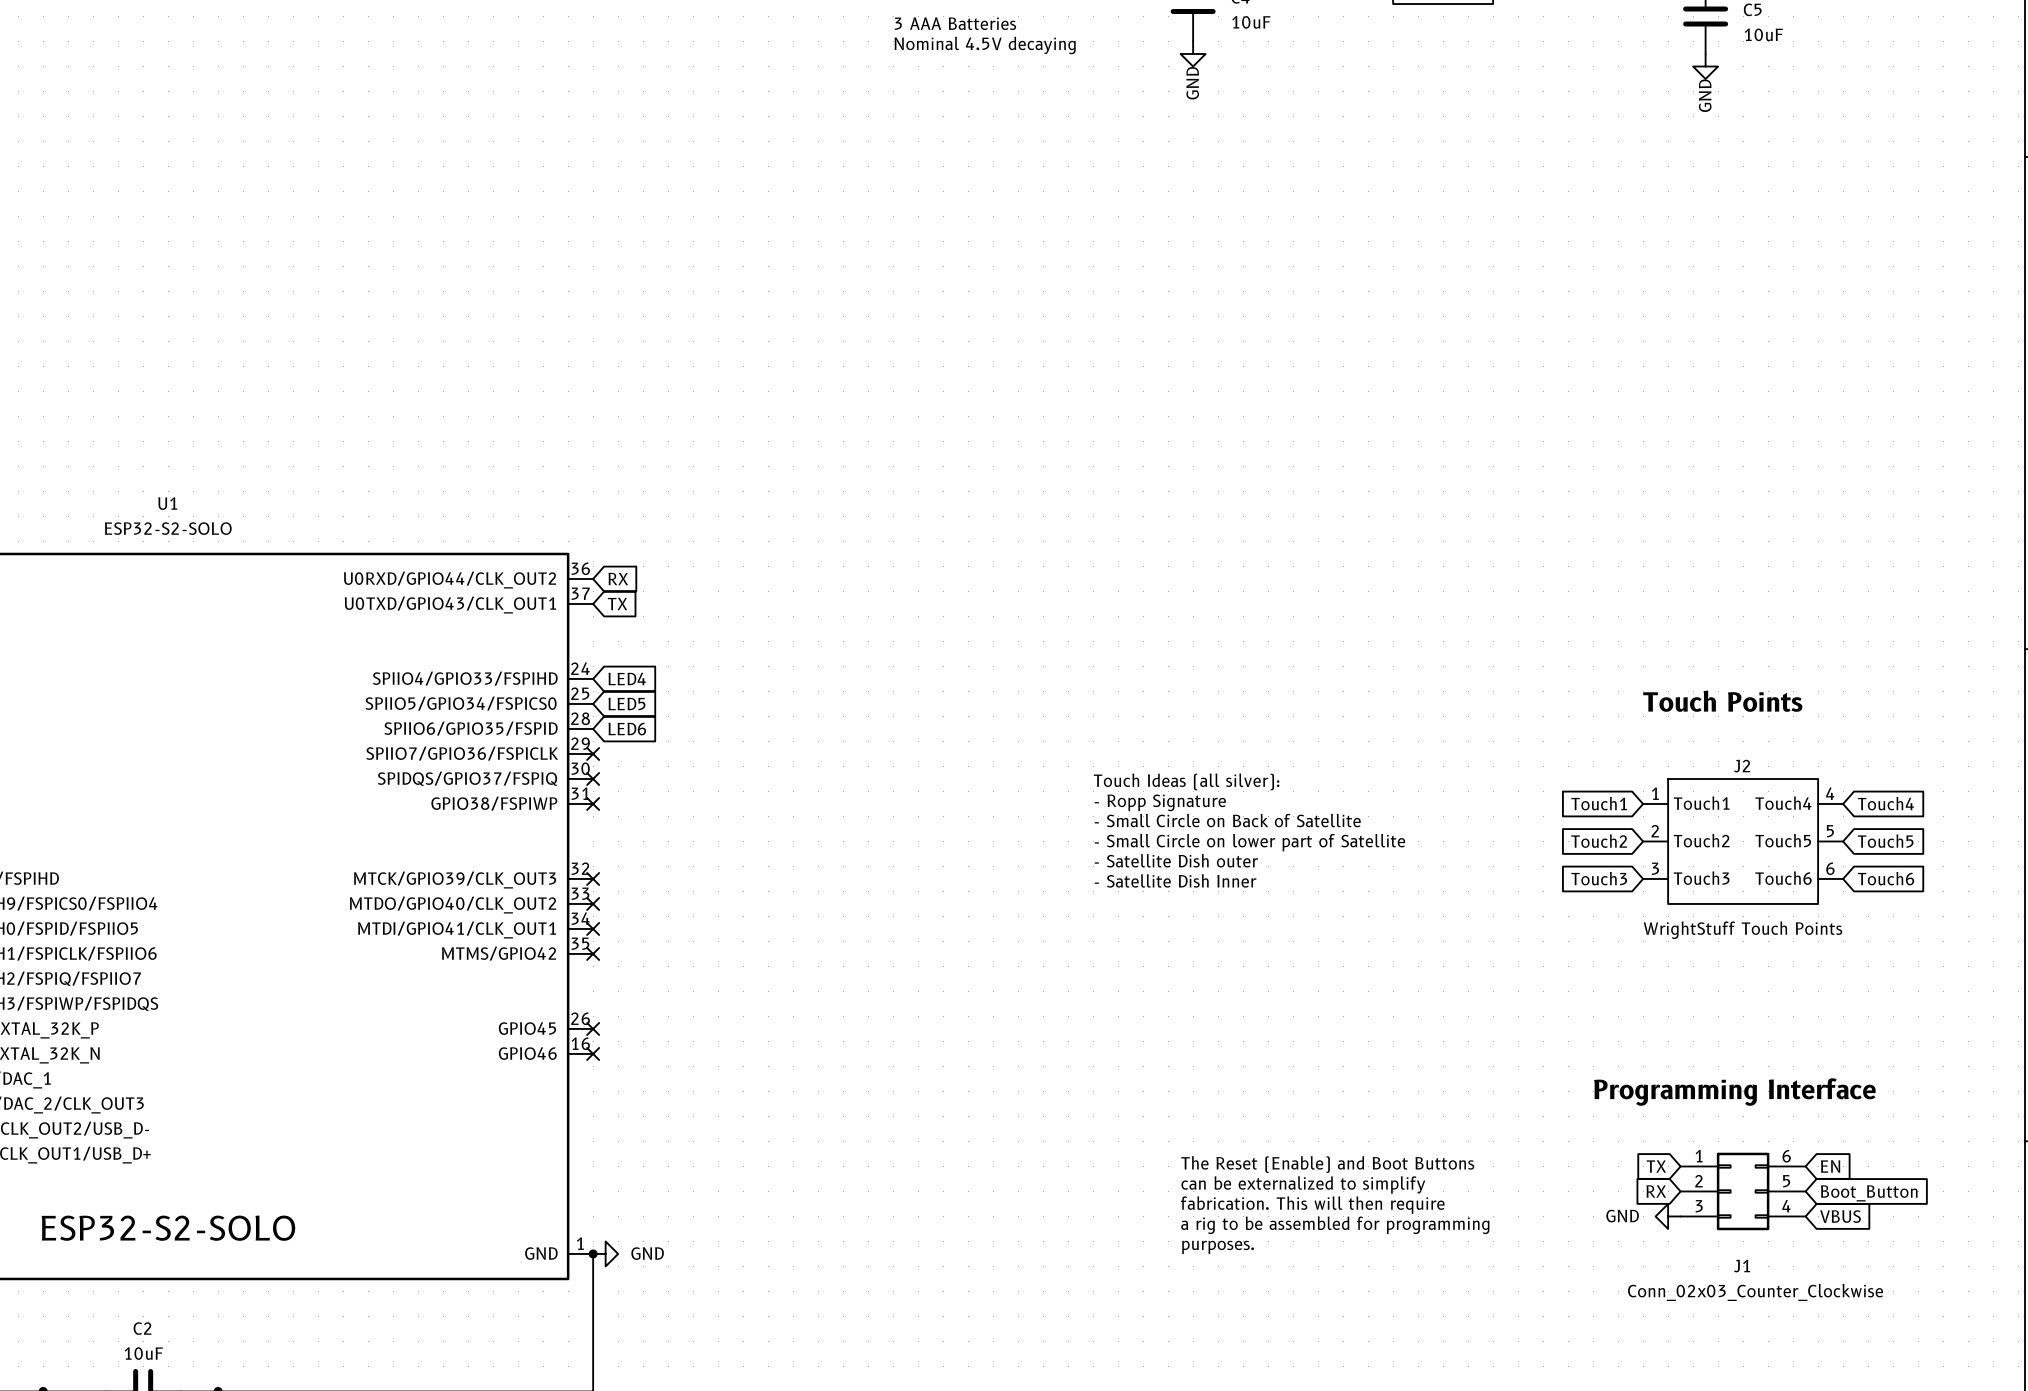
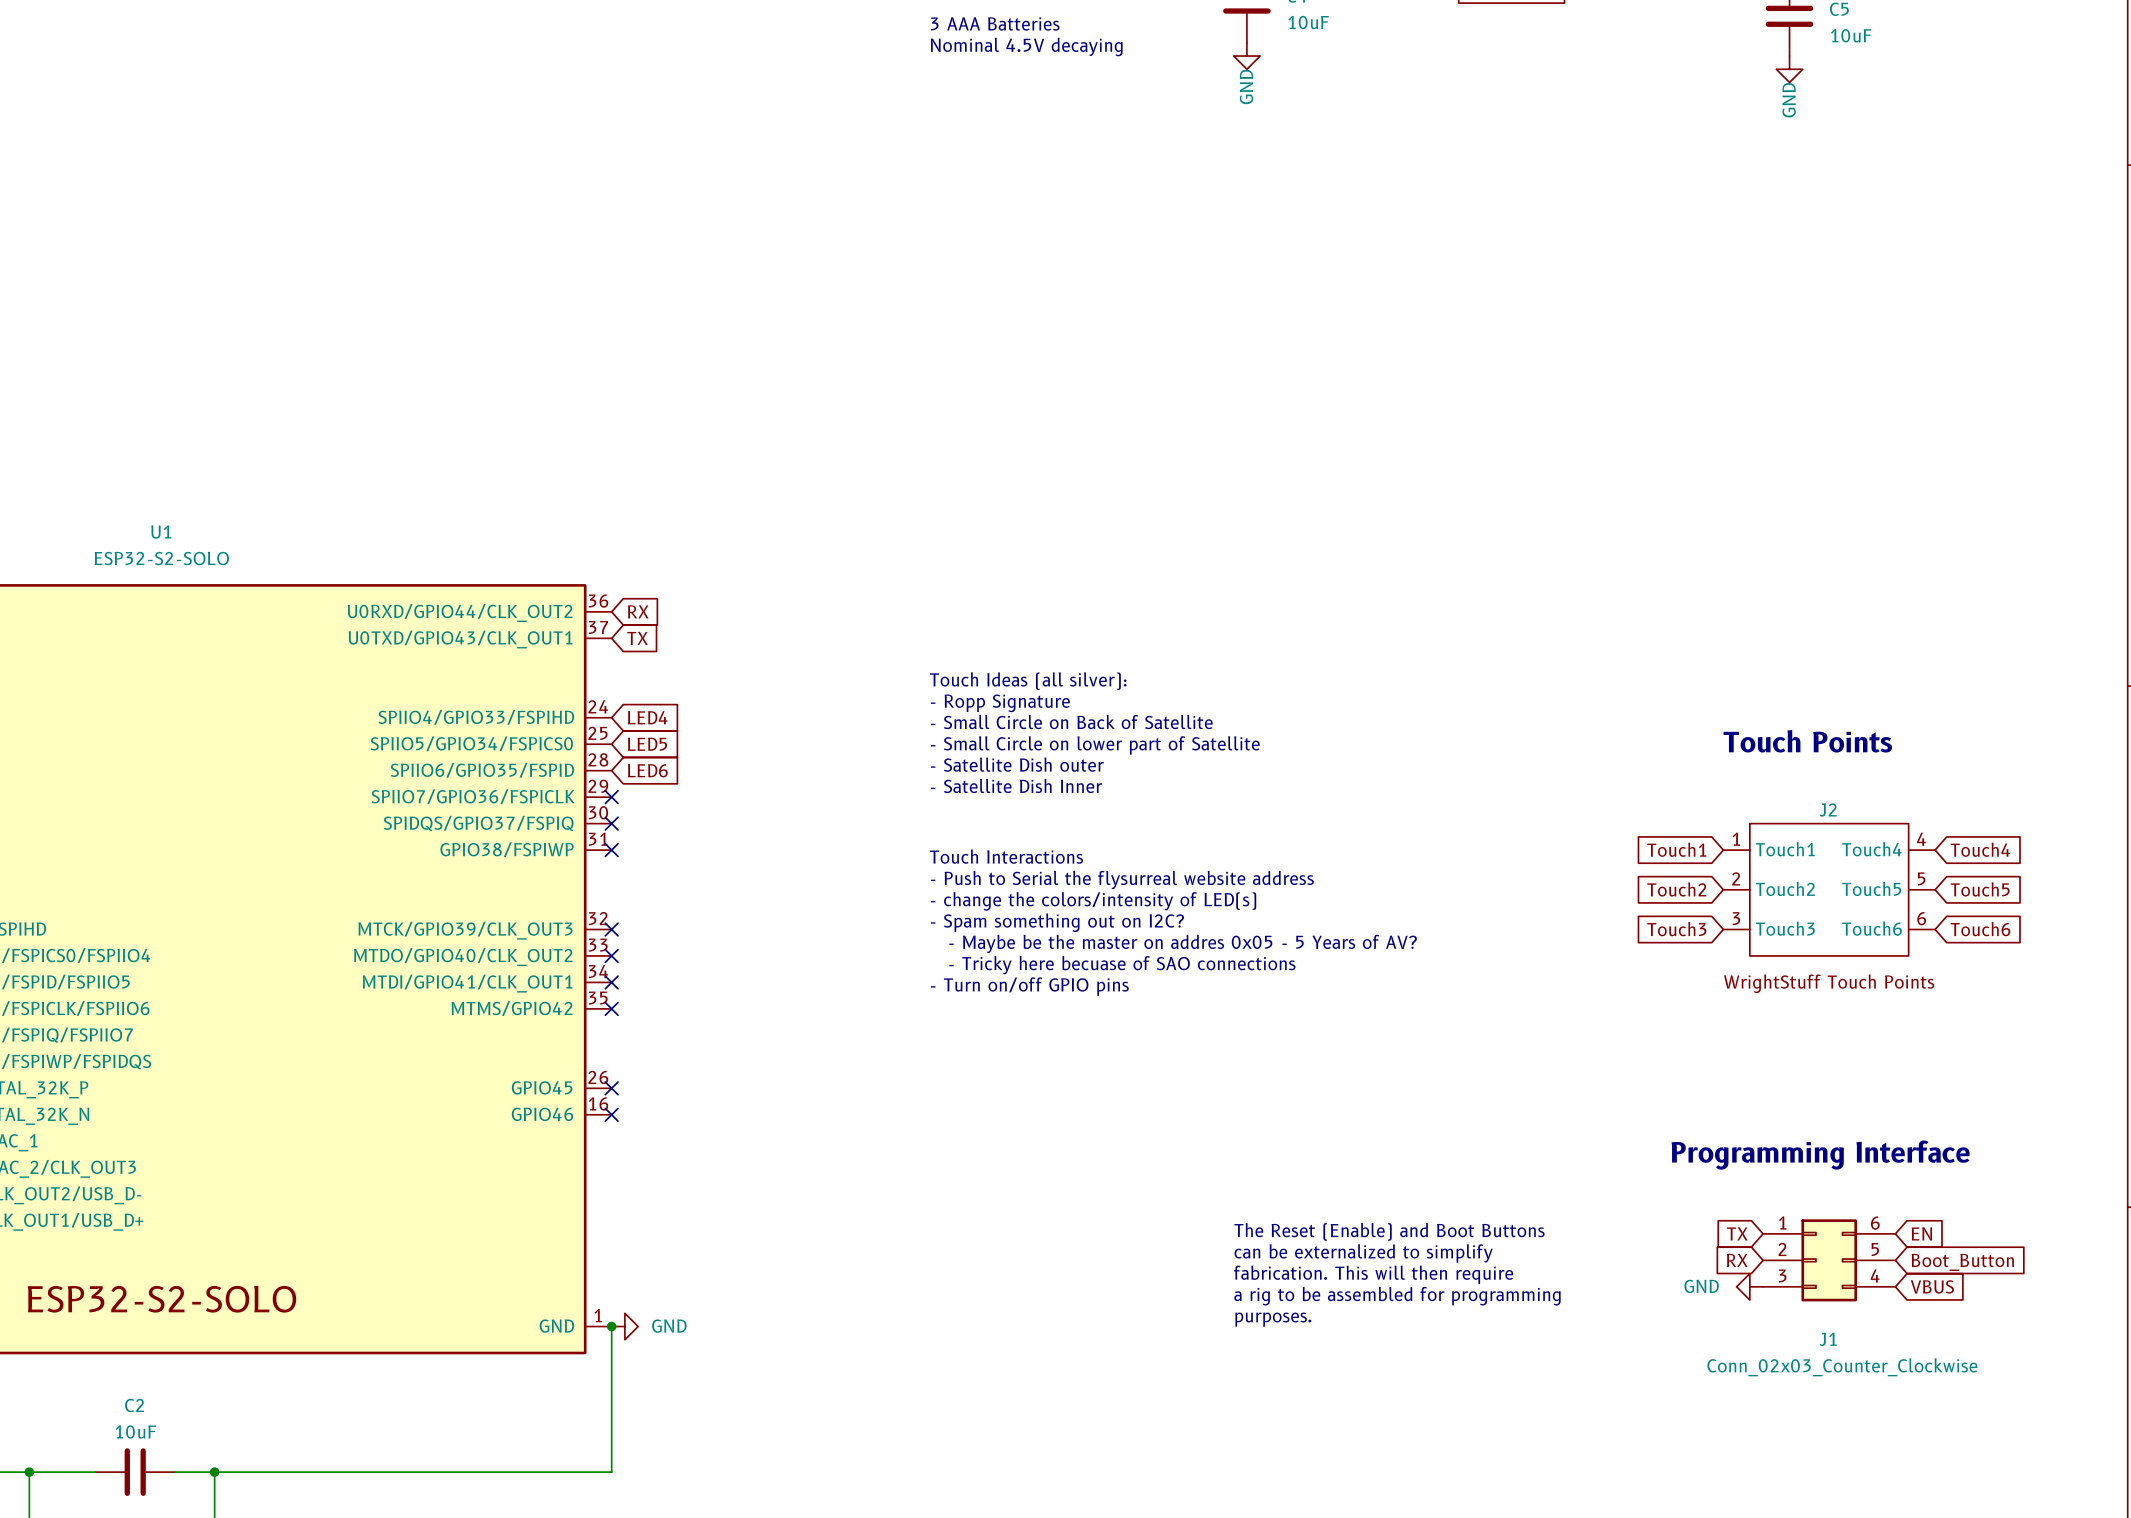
text position: Touch Ideas (all silver): (1186, 781) -> Touch Ideas (all silver): (1028, 681)
text position: - Ropp Signature (1160, 802) -> - Ropp Signature (1000, 703)
text: none -> Touch Interactions (1006, 856)
text position: - Small Circle on Back of Satellite (1227, 820) -> - Small Circle on Back of Satellite (1071, 722)
text: none -> - Push to Serial the flysurreal website address (1122, 879)
text position: - Small Circle on lower part of Satellite (1249, 842) -> - Small Circle on lower part of Satellite (1095, 745)
text: none -> - change the colors/intensity of LED(s) (1093, 901)
text position: - Satellite Dish outer (1176, 860) -> - Satellite Dish outer (1017, 764)
text: none -> - Spam something out on I2C? (1057, 922)
text position: - Satellite Dish Inner (1175, 880) -> - Satellite Dish Inner (1016, 785)
text: none -> - Maybe be the master on addres 0x05 - 5 Years of AV? (1183, 943)
text: none -> - Tricky here becuase of SAO connections (1122, 965)
text: none -> - Turn on/off GPIO pins (1029, 986)

